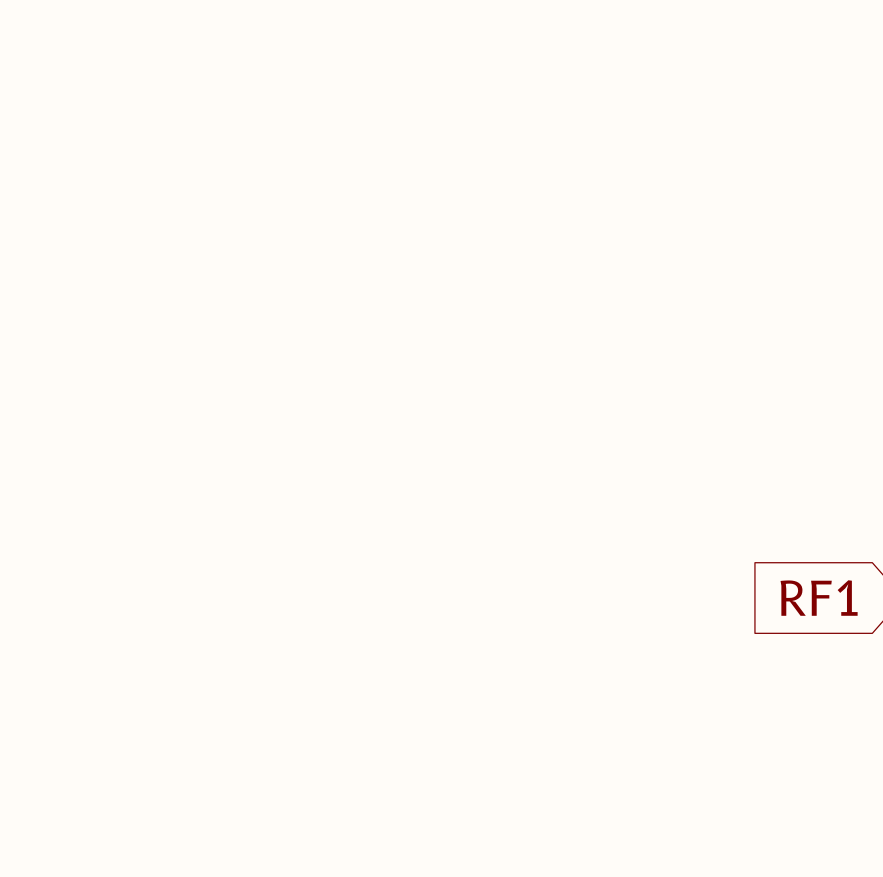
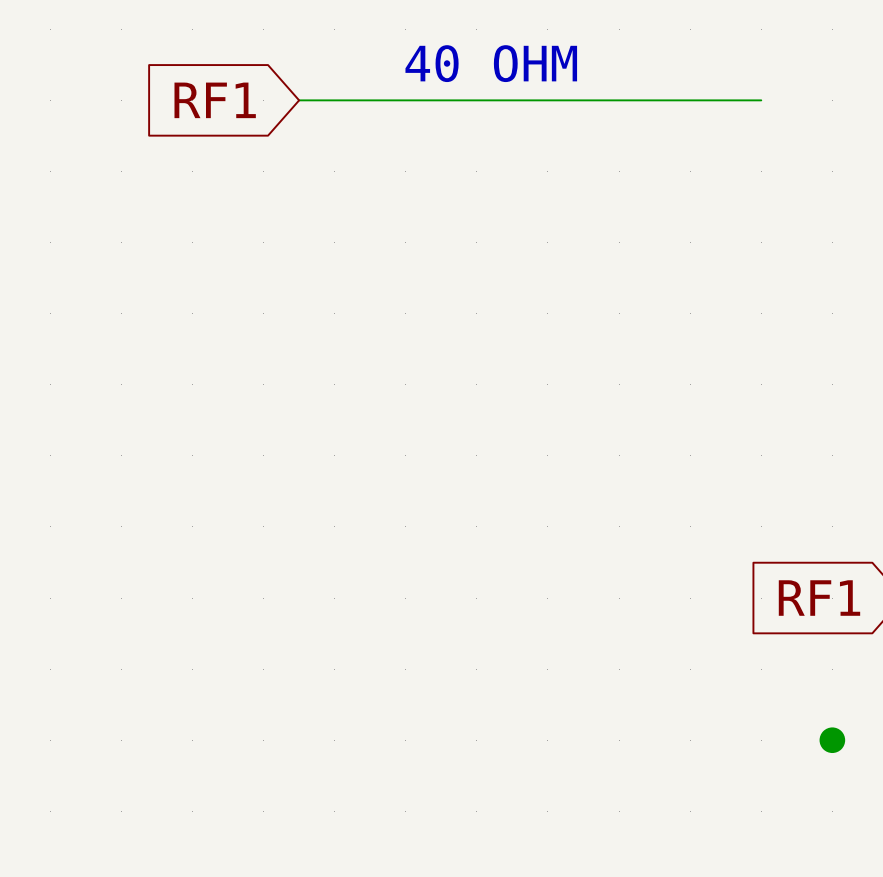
text: none -> 40 OHM (491, 63)
global label: none -> RF1 (215, 100)
wire: none -> (299, 100) (761, 100)
junction: none -> (832, 740)

